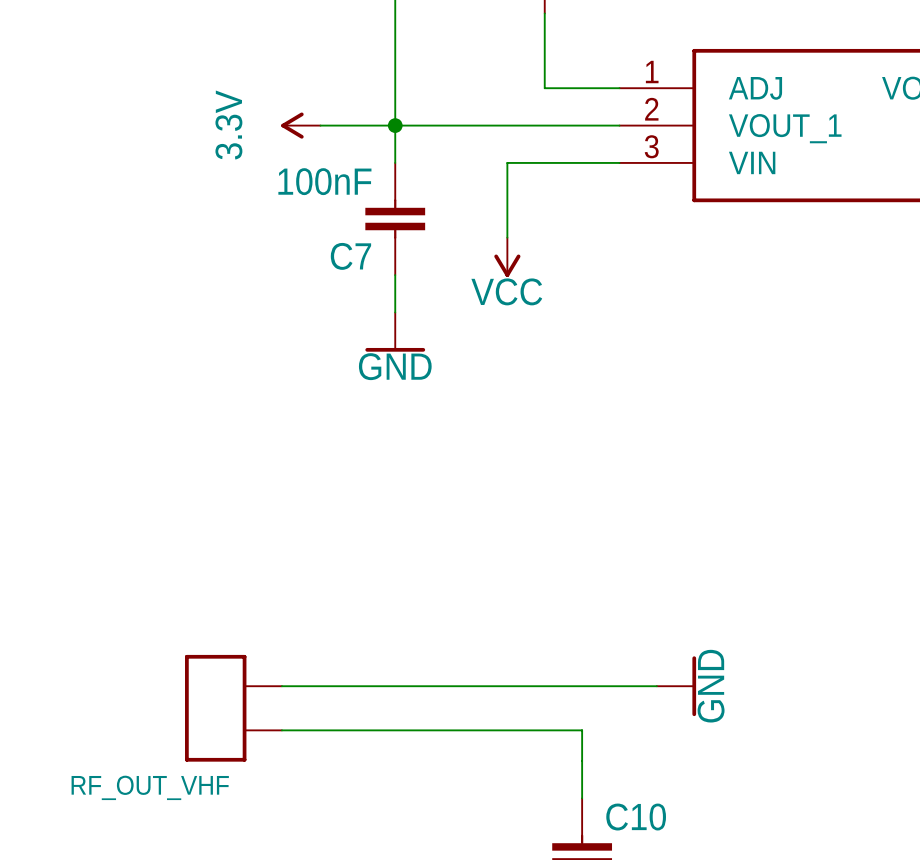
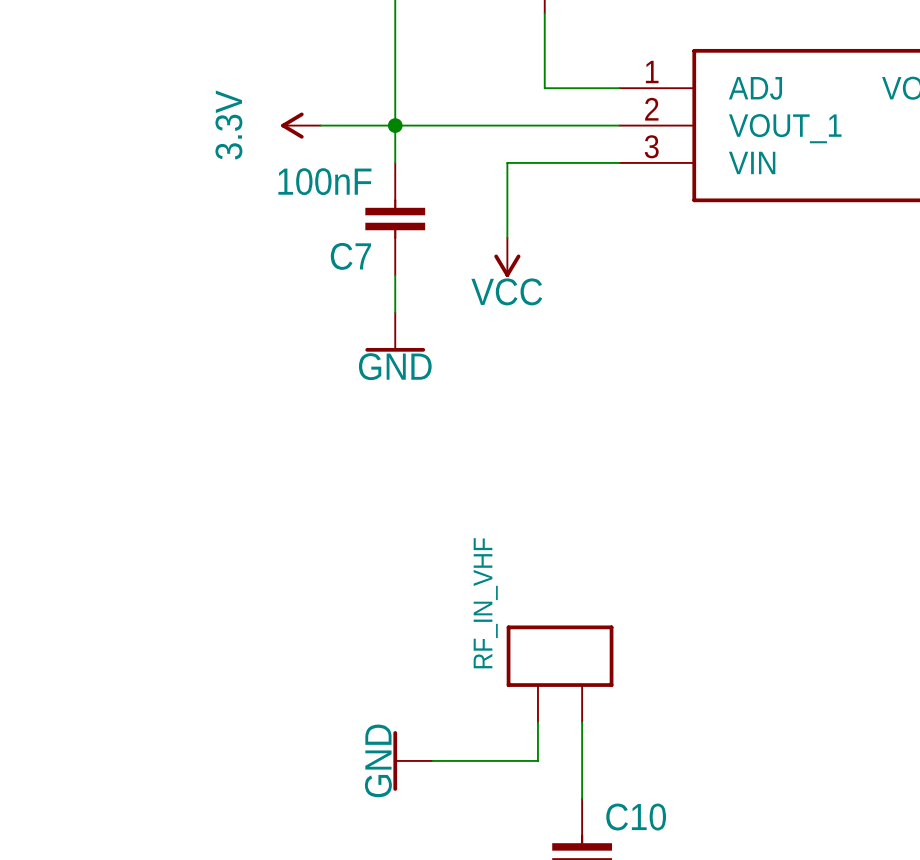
RF_IN_VHF: none -> (560, 673)
wire: (281, 686) (656, 686) -> none
power symbol: GND (676, 686) -> none
RF_OUT_VHF: (233, 708) -> none
wire: none -> (537, 722) (537, 760) (432, 760)
wire: (281, 730) (582, 730) -> (582, 722) (582, 730)
power symbol: none -> GND (413, 760)

